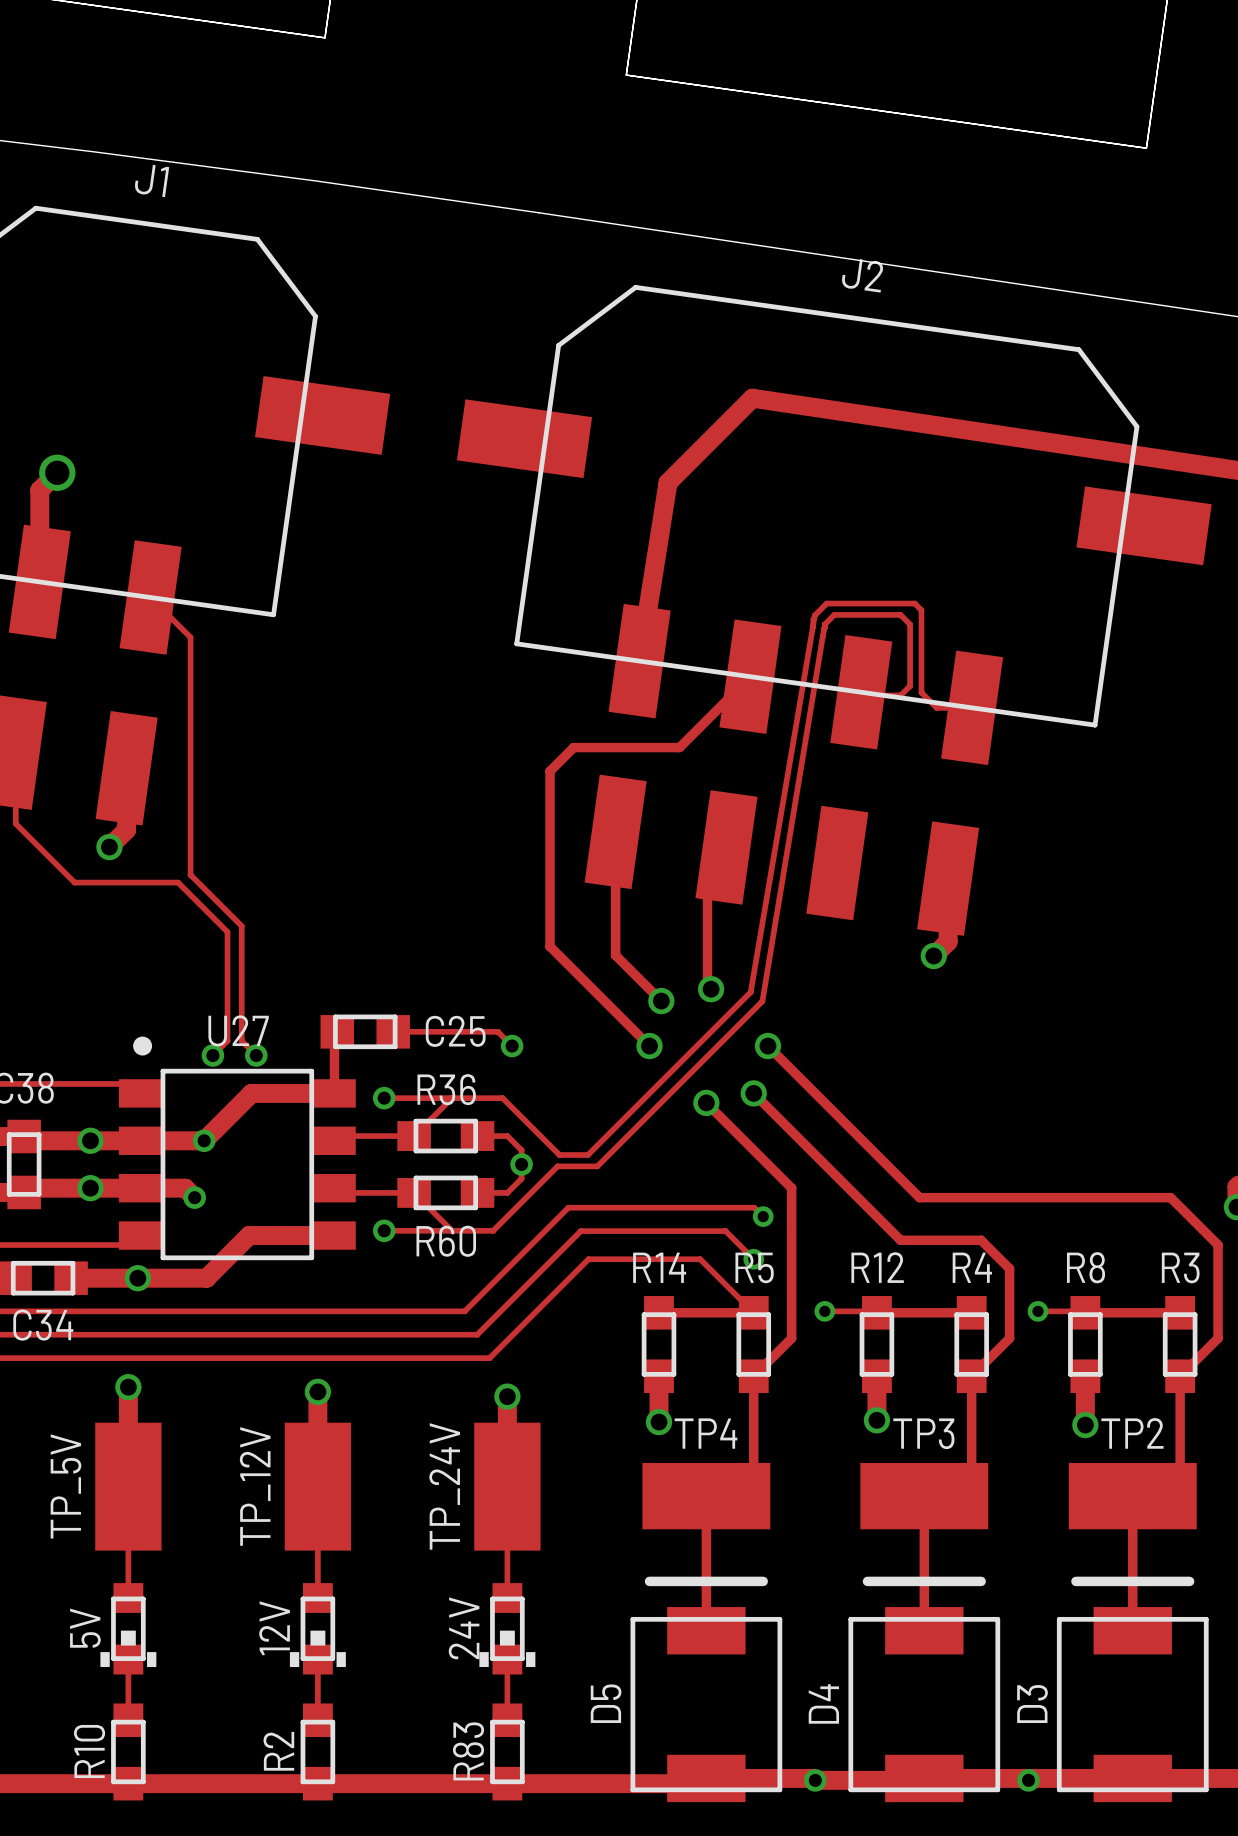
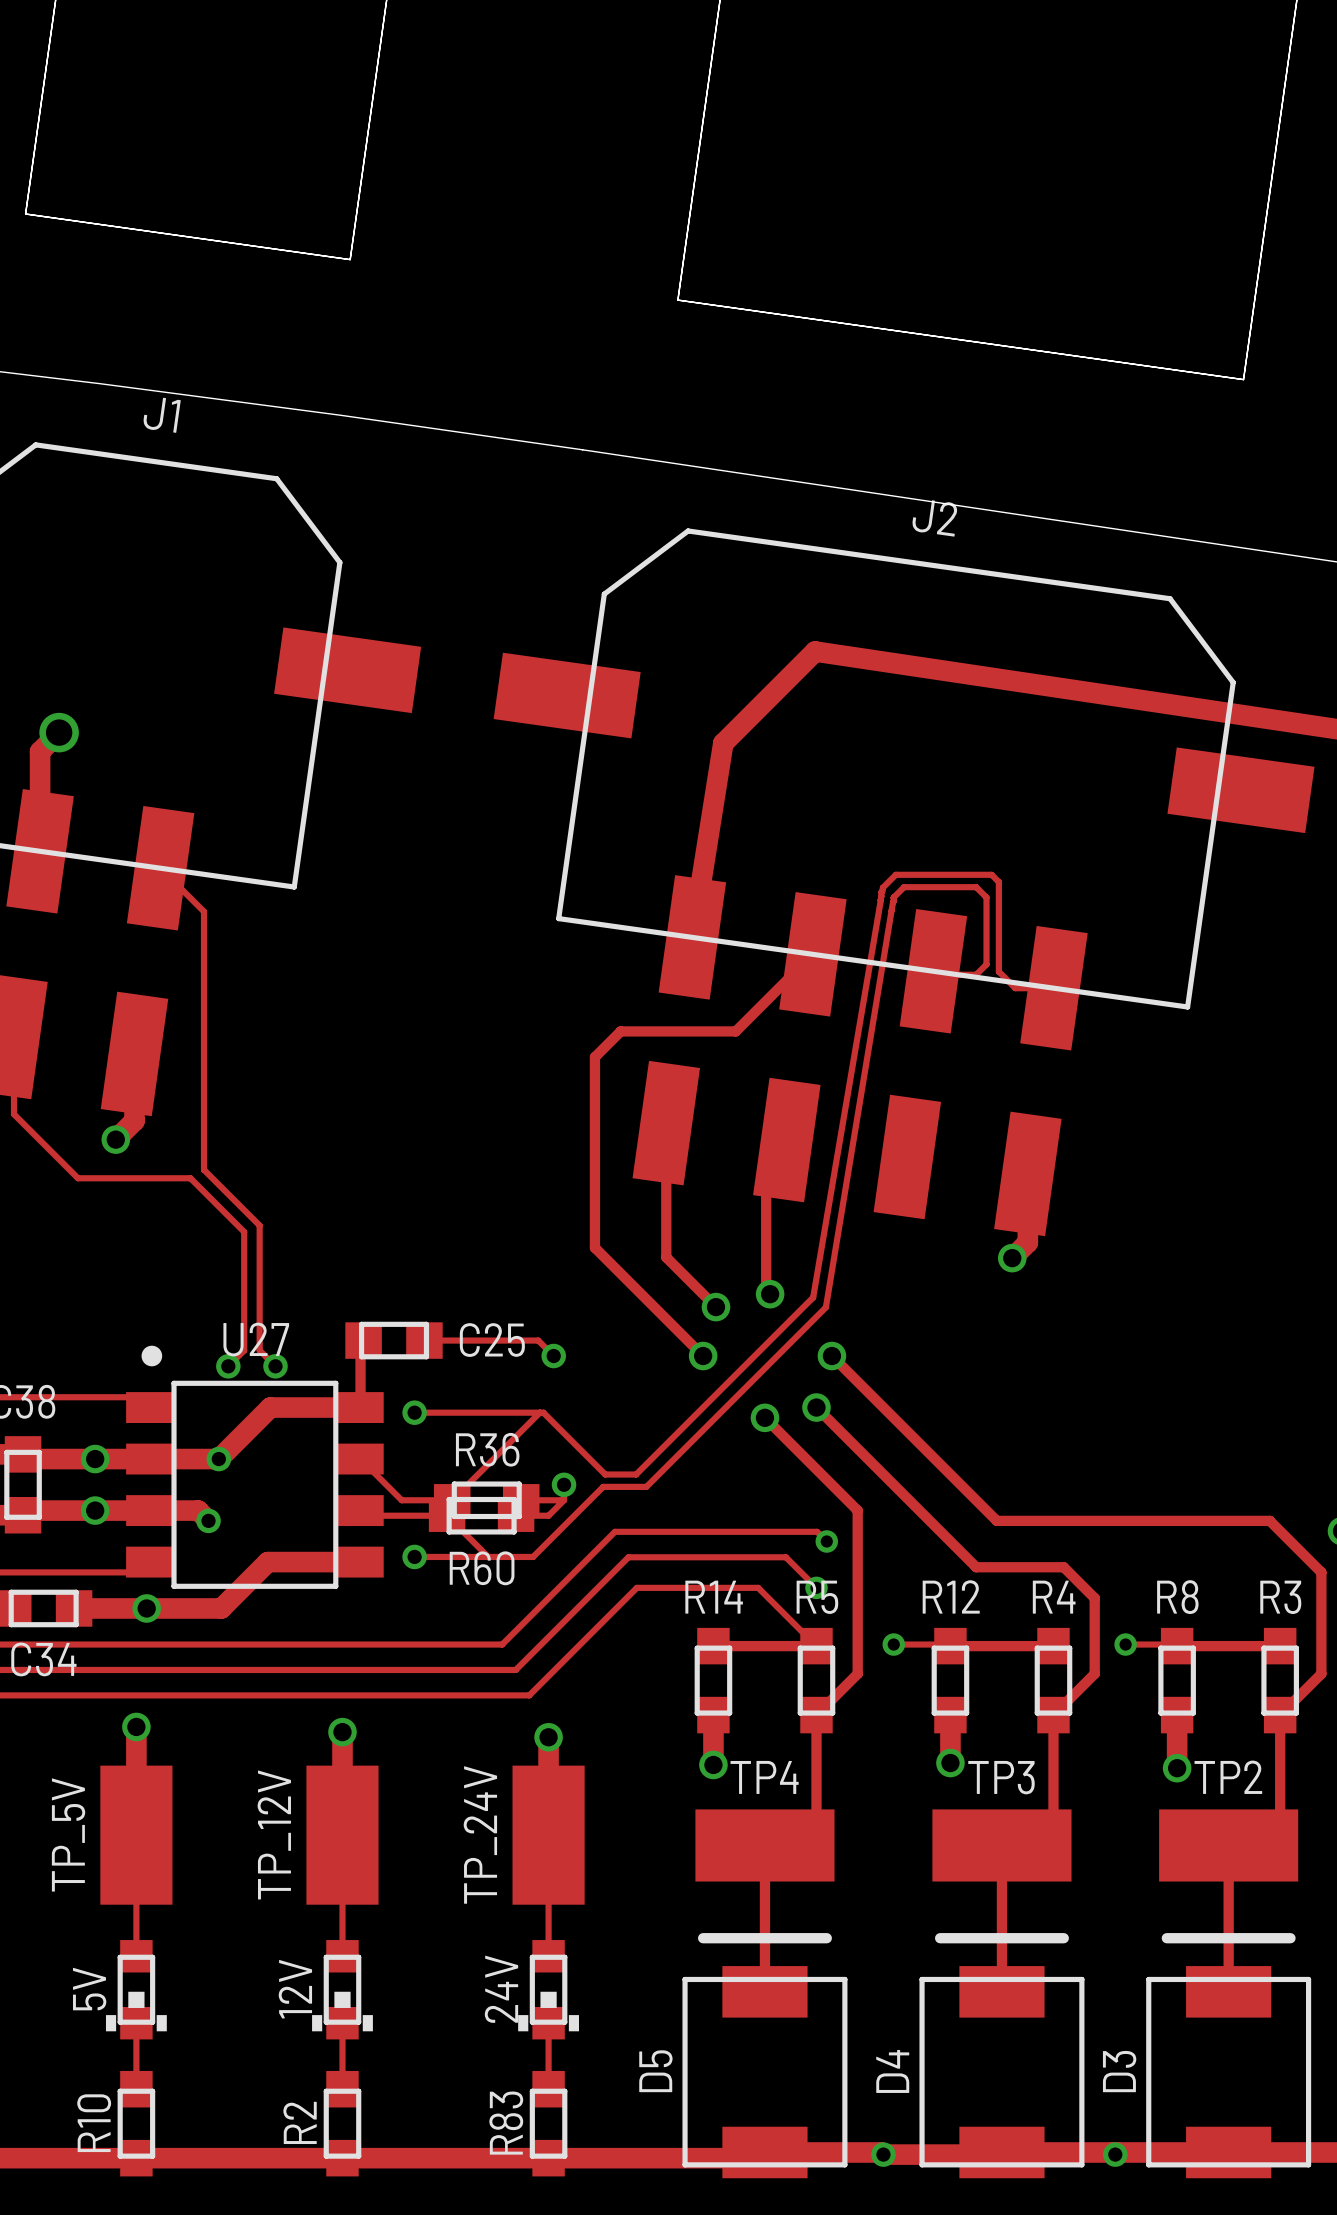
track: (451, 1098) (414, 1136) (339, 1136) (334, 1140) -> (539, 1412) (452, 1500) (401, 1500) (360, 1459)
R36 position: (445, 1136) -> (486, 1500)
track: (477, 1136) (507, 1136) (521, 1150) (521, 1164) -> none
track: none -> (521, 1500) (564, 1500)

